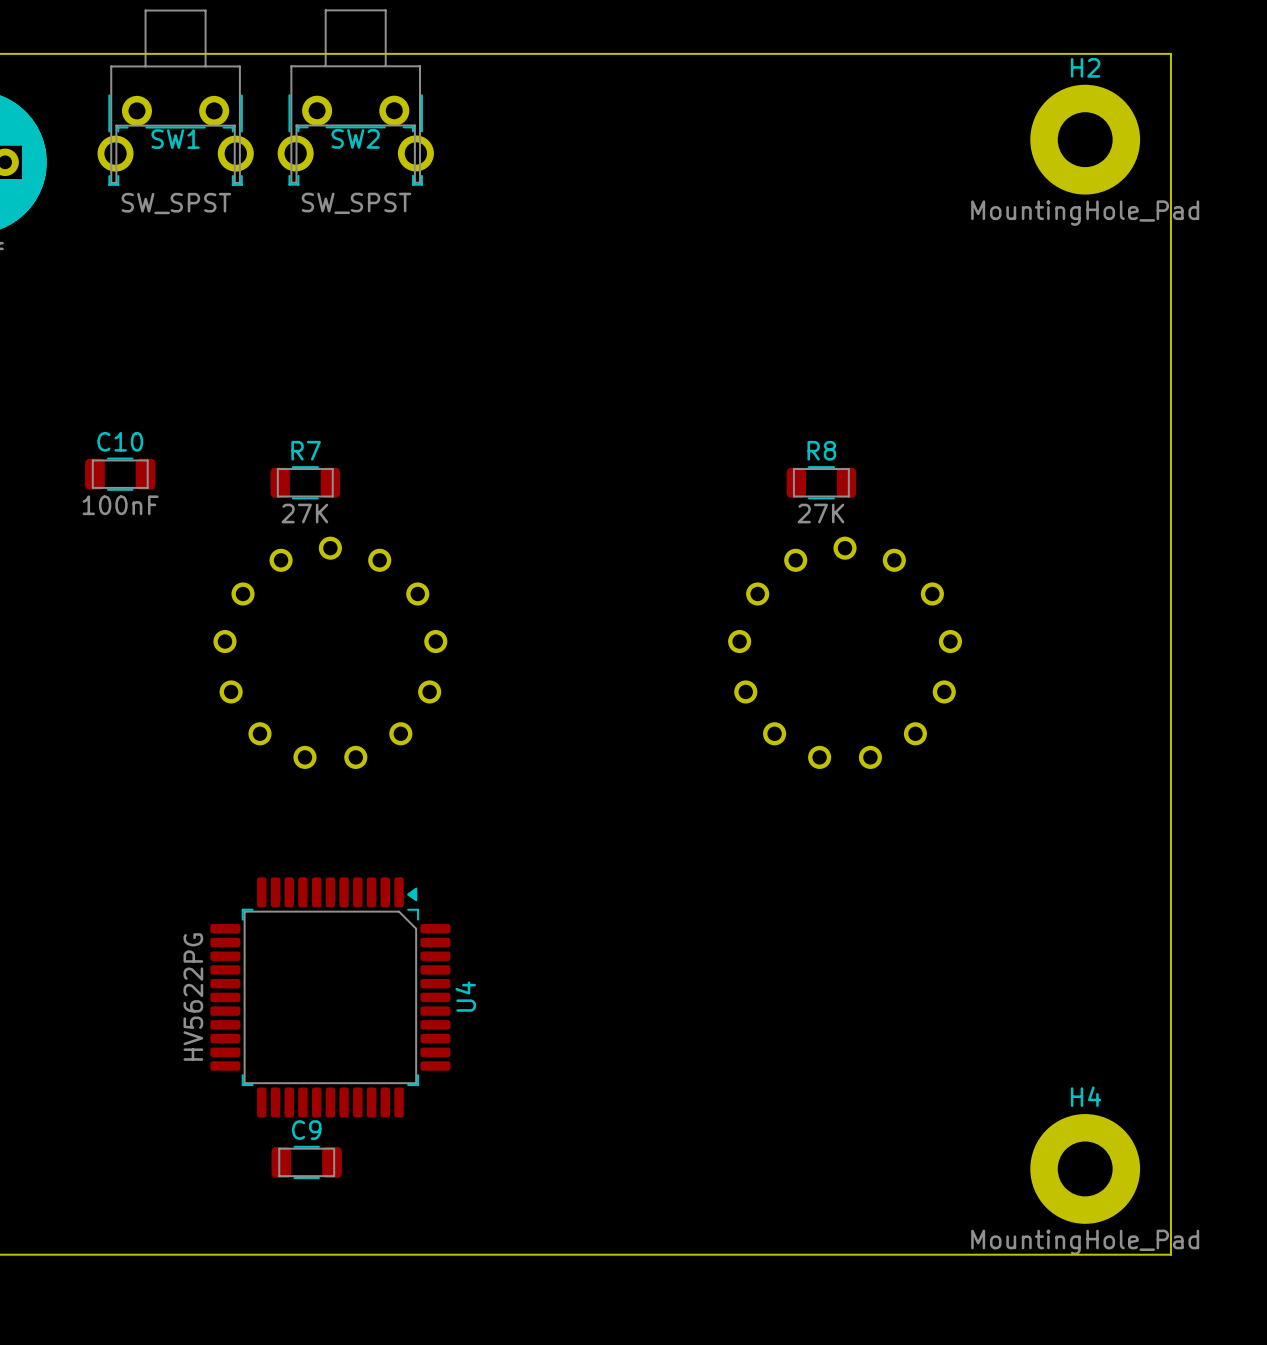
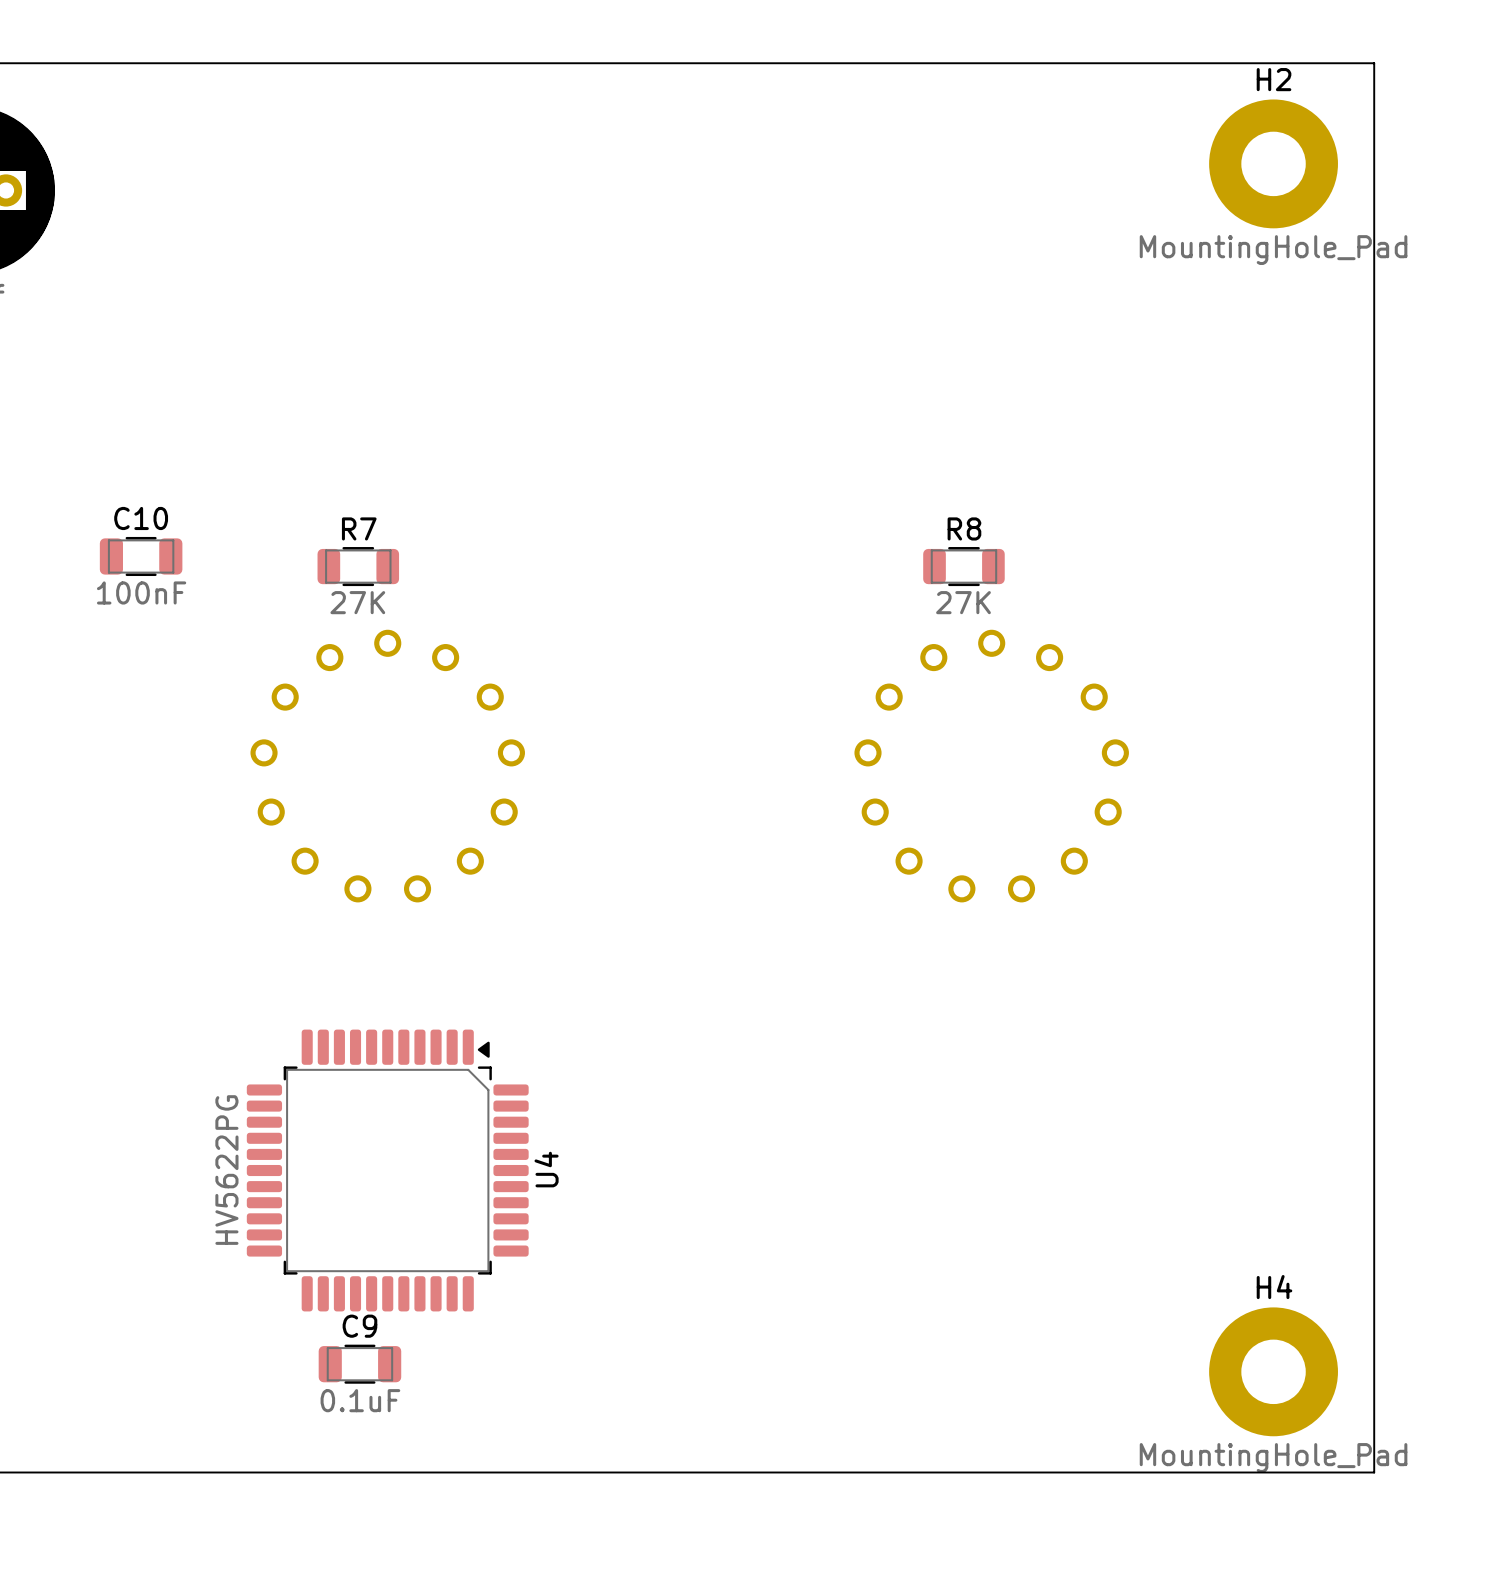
SW1: SW_SPST (175, 97) -> none
SW2: SW_SPST (355, 97) -> none
C9 value: none -> 0.1uF (360, 1400)

